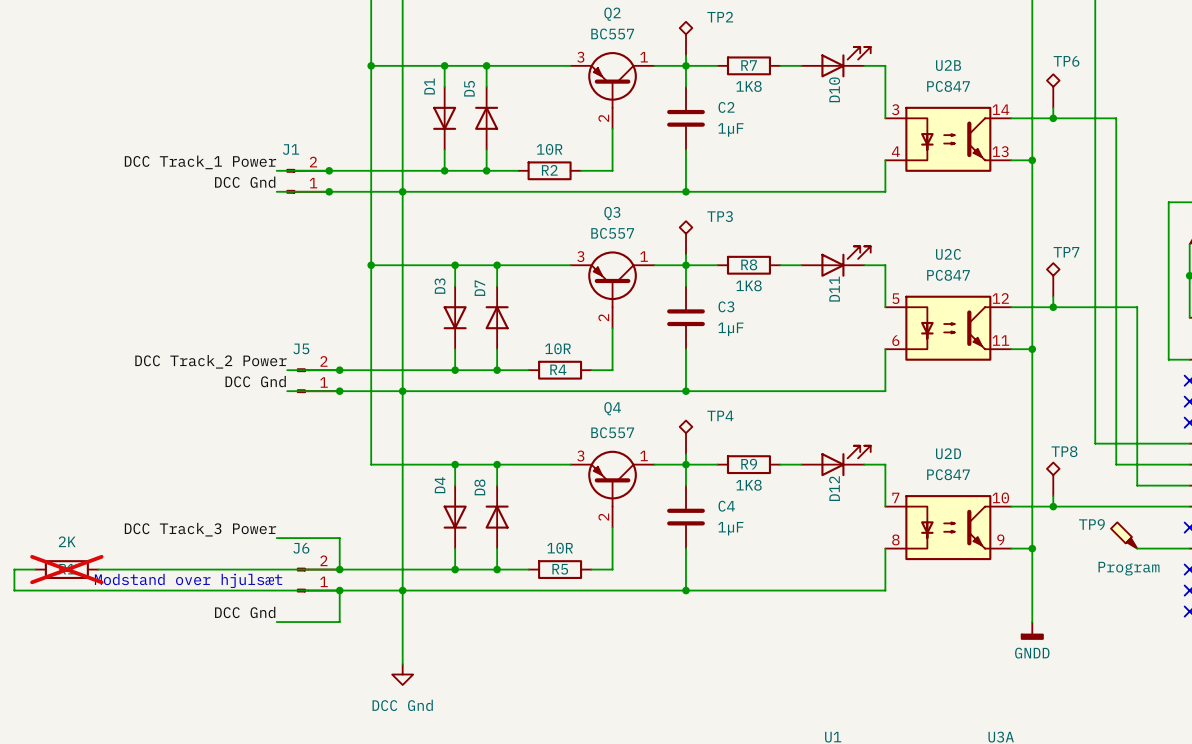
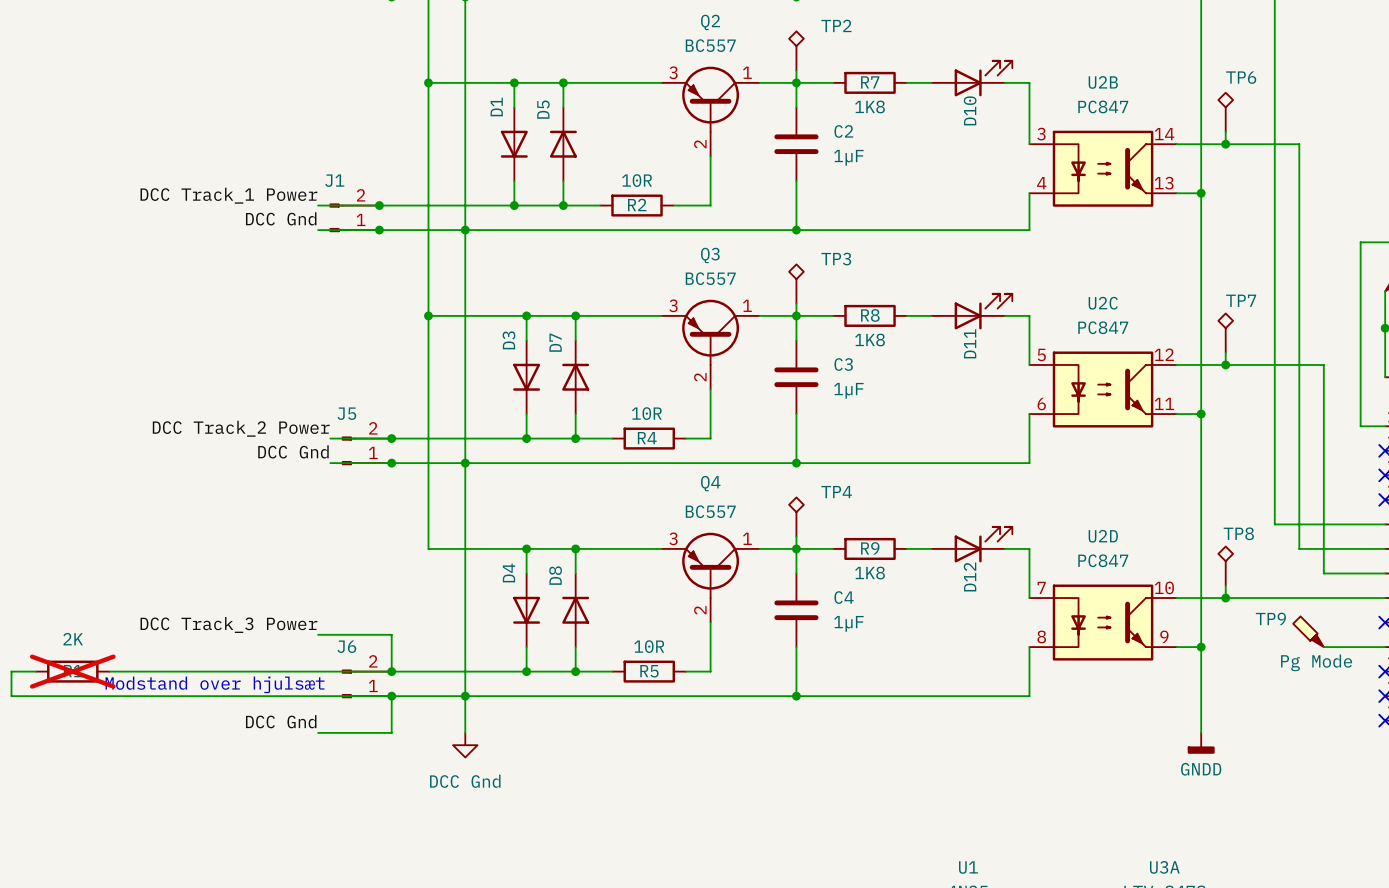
TP9 value: Program (1129, 568) -> Pg Mode (1316, 662)
wire: (402, 622) (402, 664) -> none
power symbol position: DCC Gnd (402, 674) -> DCC Gnd (465, 745)

